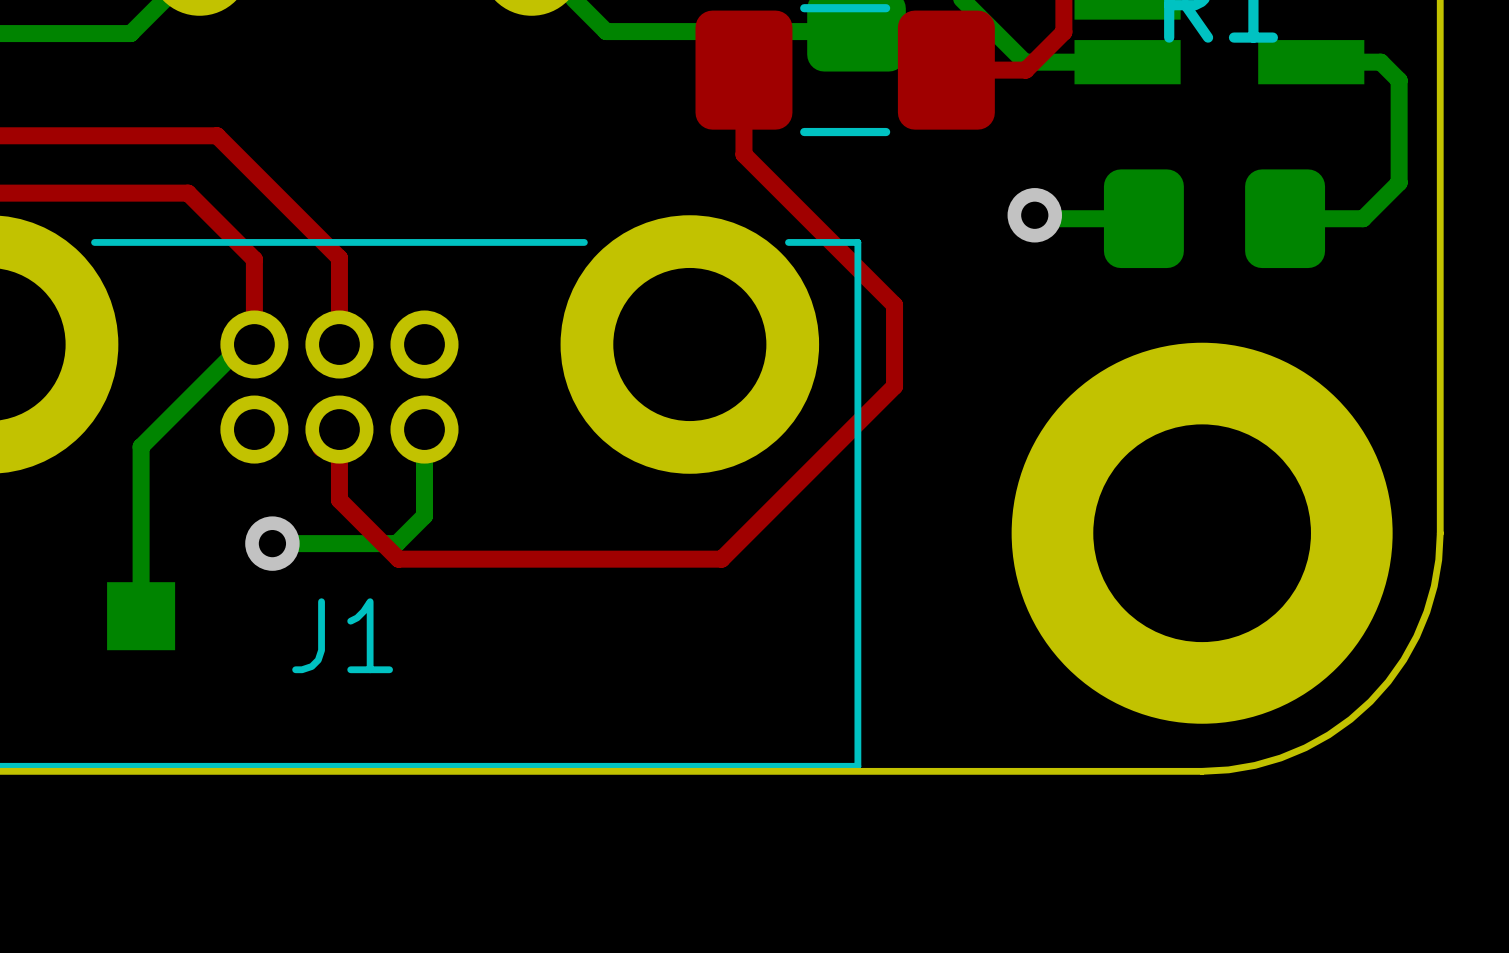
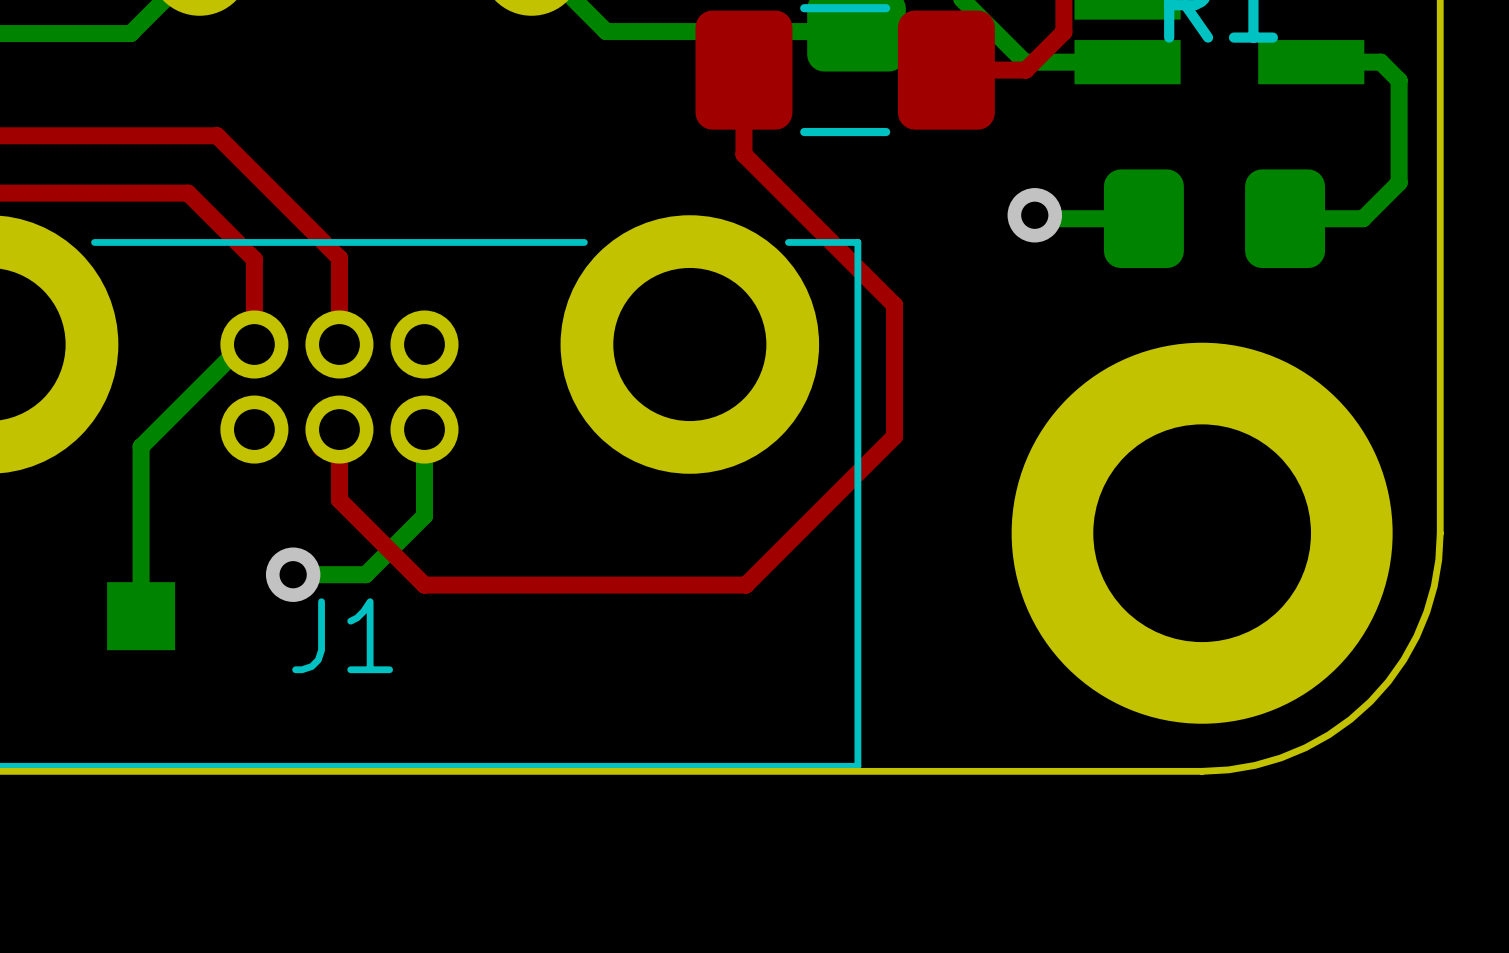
top track: (894, 386) (721, 559) (398, 559) -> (894, 386) (894, 436) (745, 585) (424, 585) (398, 559)
bottom track: (272, 543) (396, 543) -> (293, 574) (365, 574) (396, 543)
via position: (272, 543) -> (293, 574)

